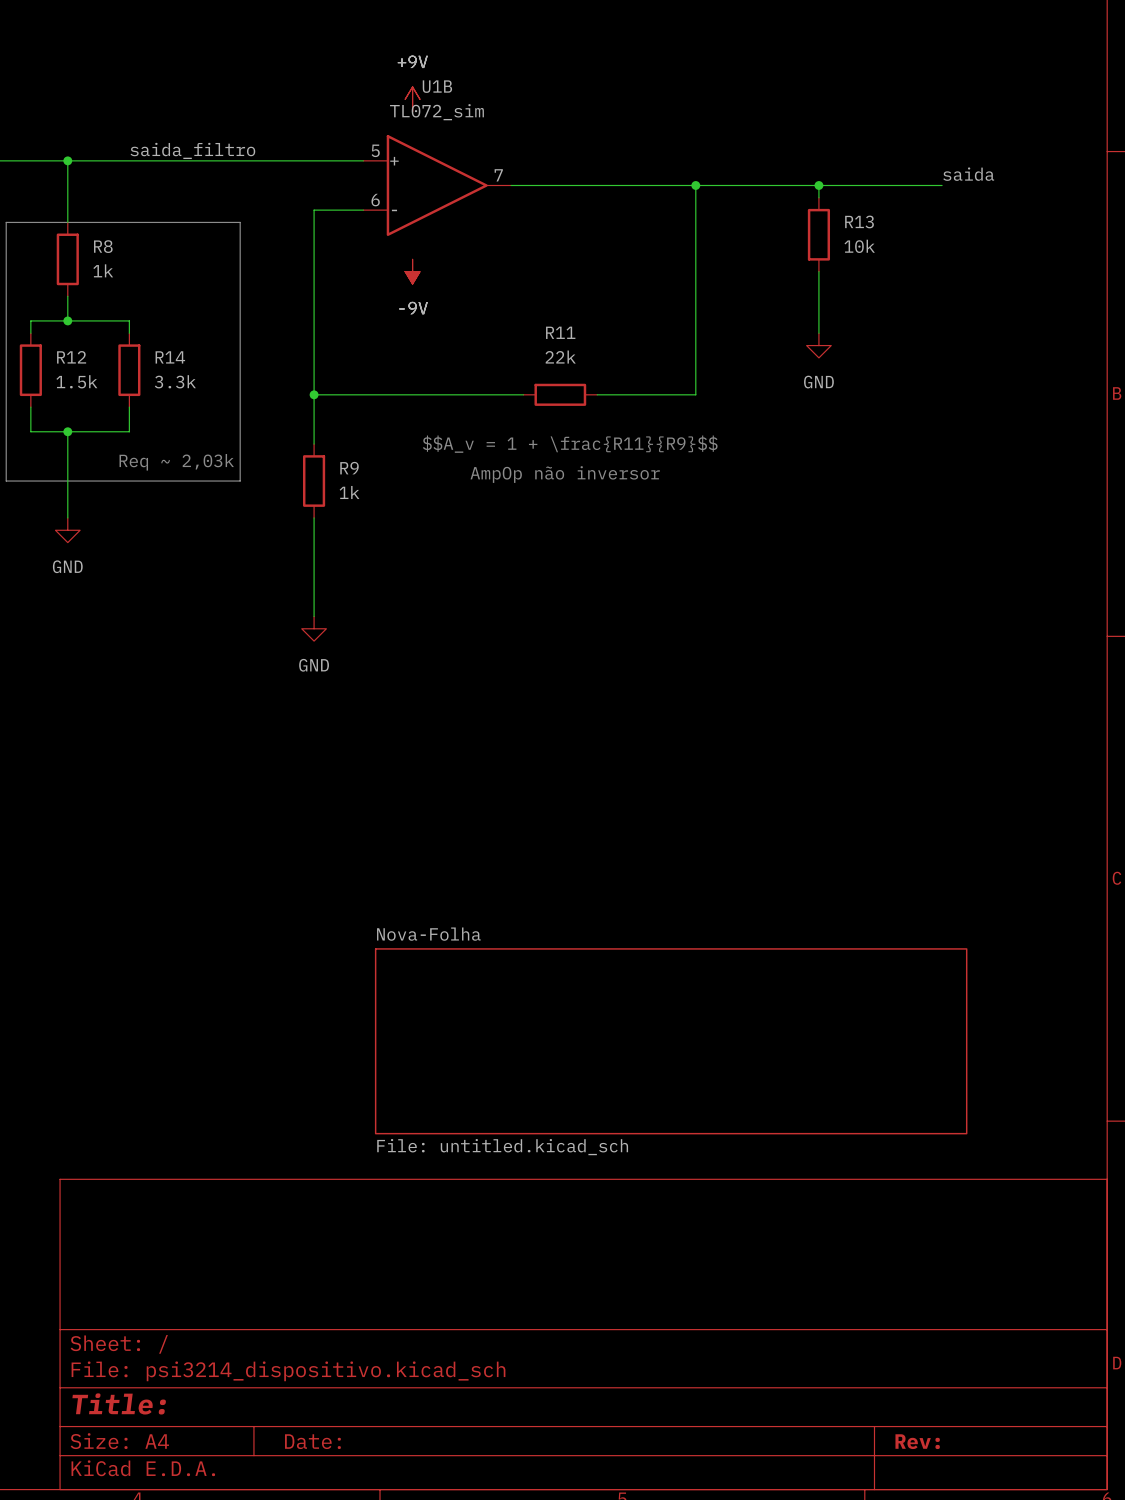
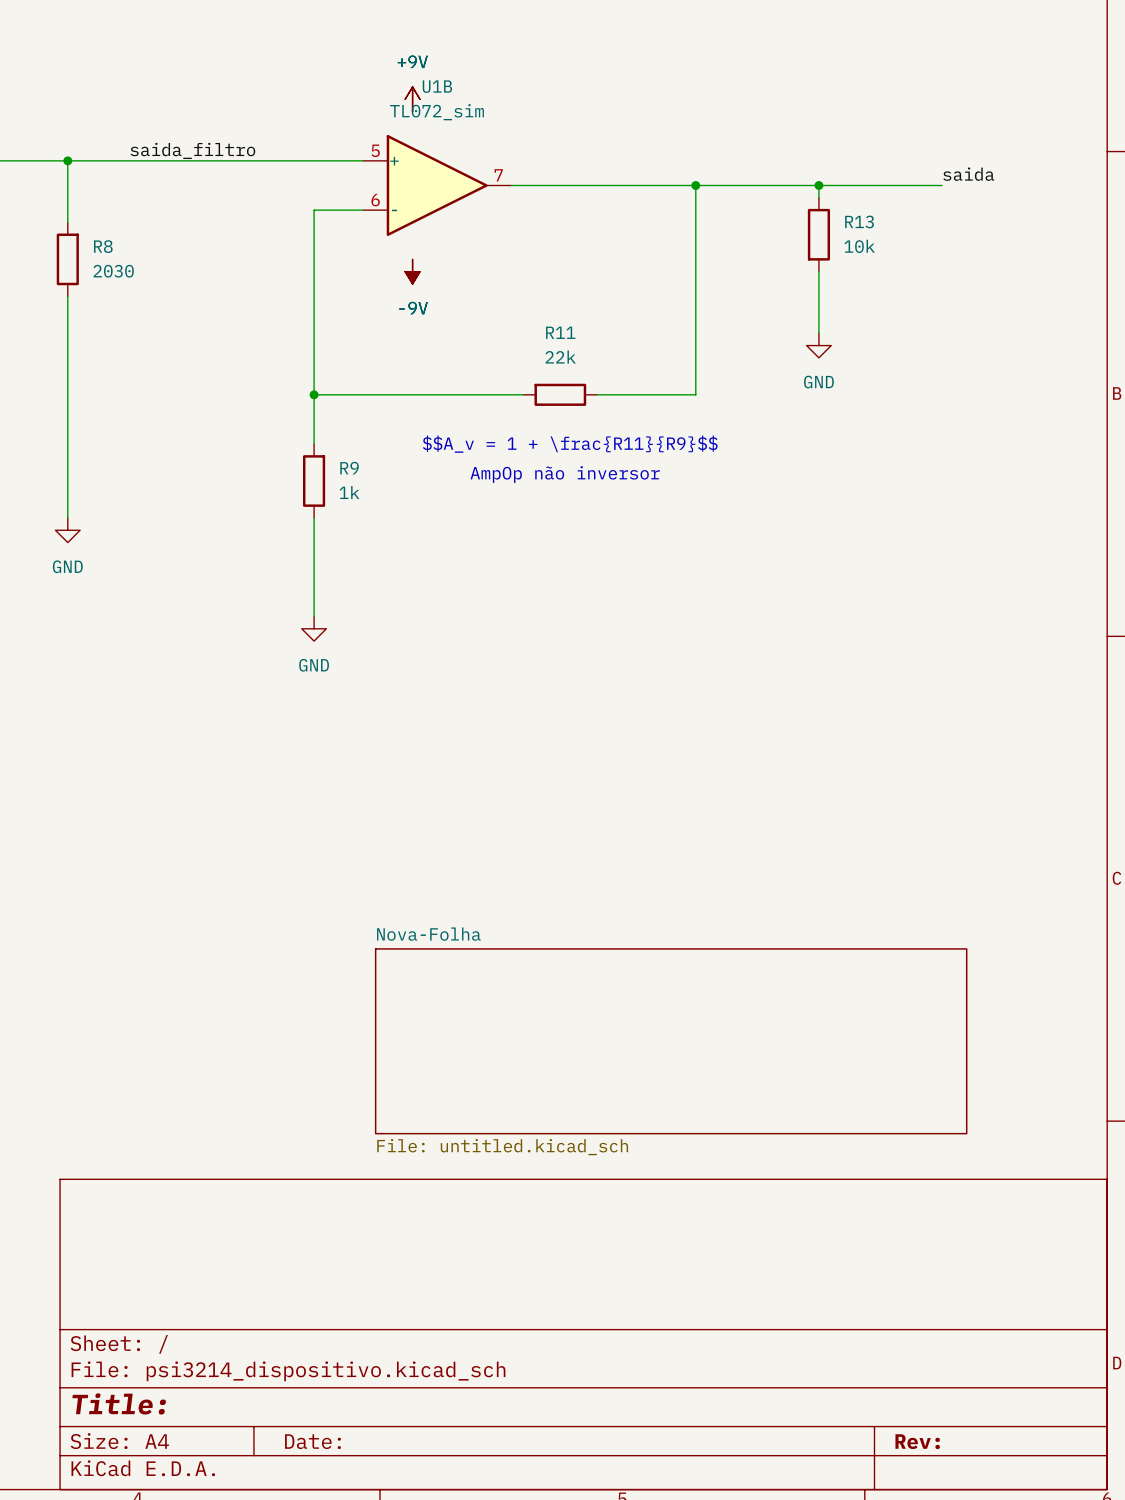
line: (6, 222) (240, 222) (240, 481) (6, 481) (6, 222) -> none
R8 value: 1k (103, 270) -> 2030 (113, 271)
wire: none -> (67, 320) (67, 431)
junction: (67, 320) -> none
wire: (30, 333) (30, 320) (129, 320) (129, 333) -> none
R12: 1.5k (30, 370) -> none
R14: 3.3k (129, 370) -> none
wire: (30, 407) (30, 431) (129, 431) (129, 407) -> none
junction: (67, 431) -> none
text: Req ~ 2,03k (176, 462) -> none

